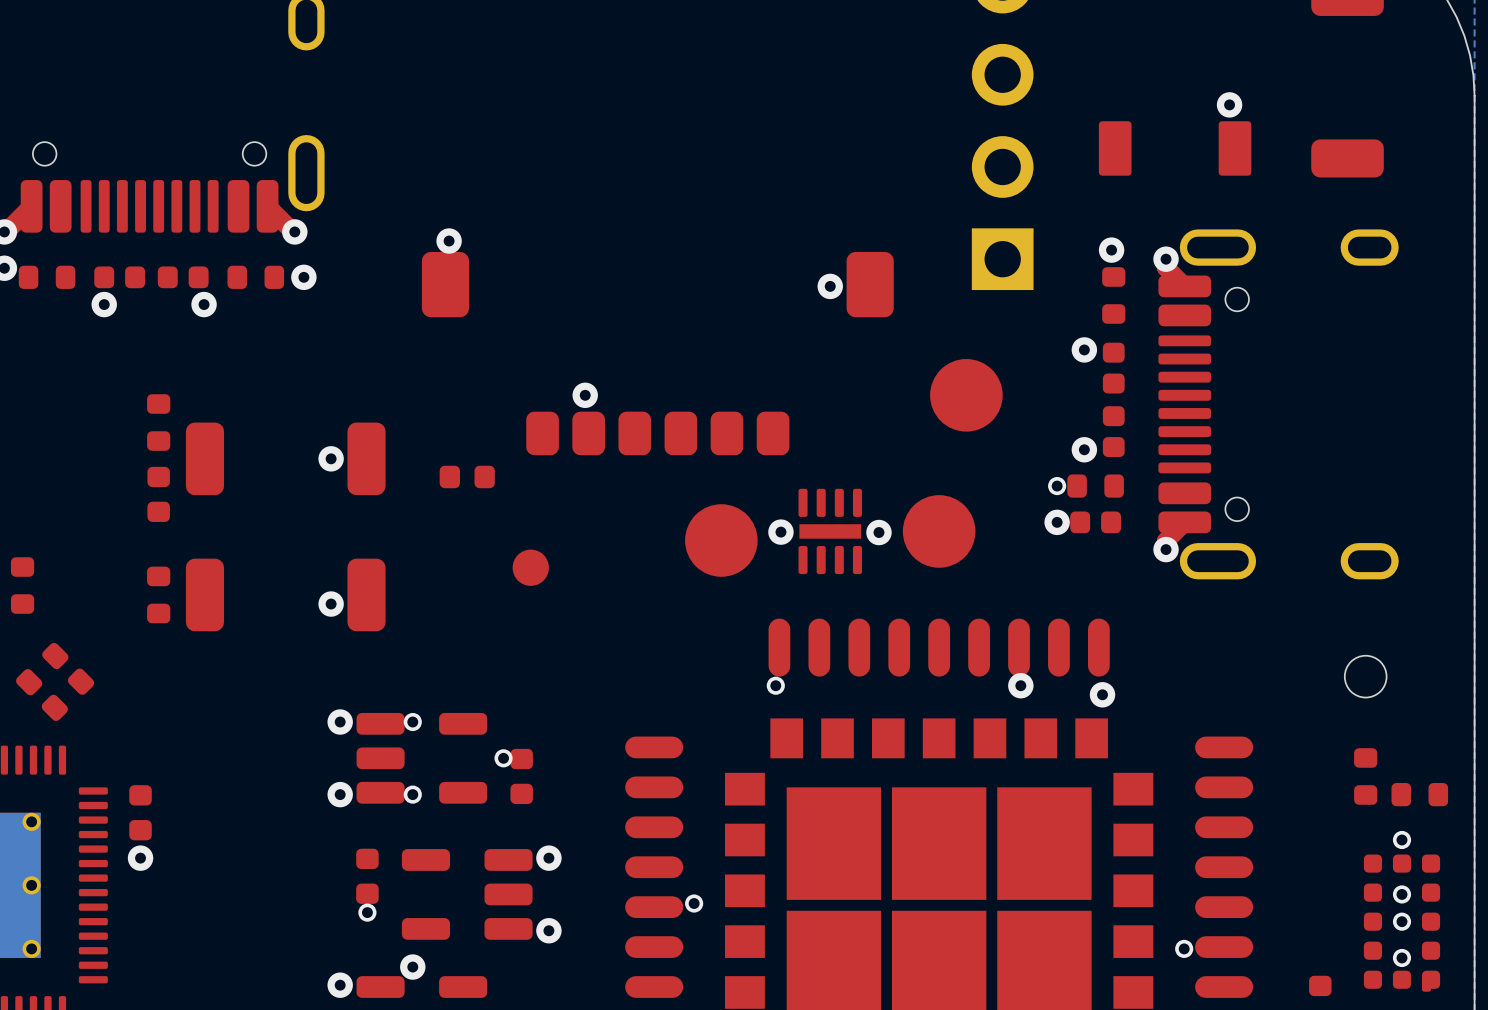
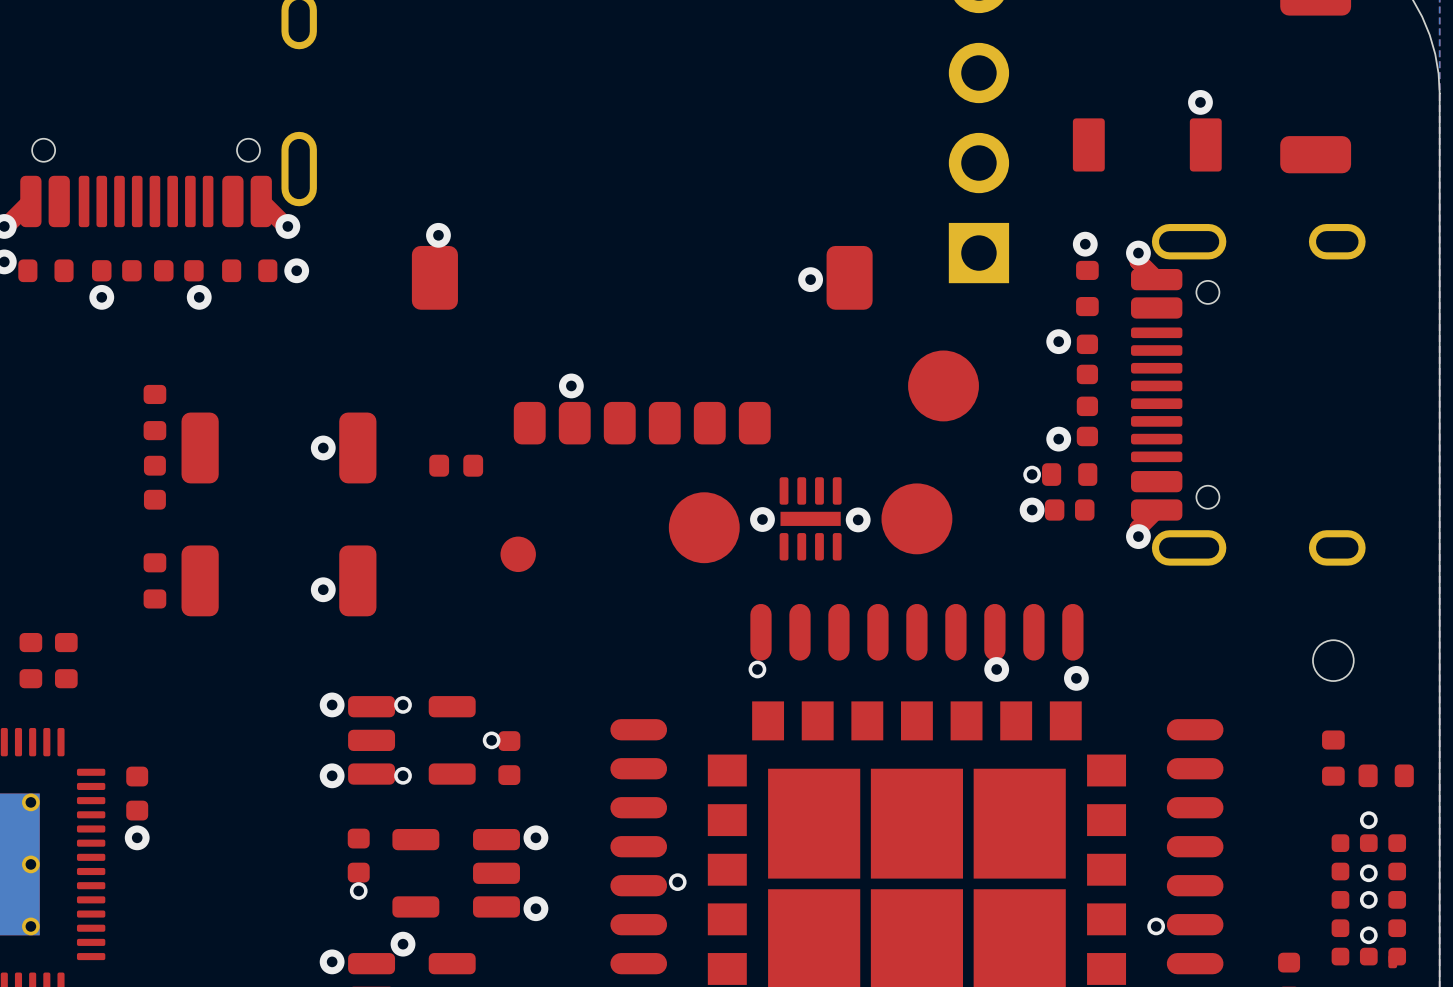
part: (22, 585) -> none
part: (42, 669) -> none
part: none -> (30, 660)
part: none -> (66, 660)
part: (67, 694) -> none

